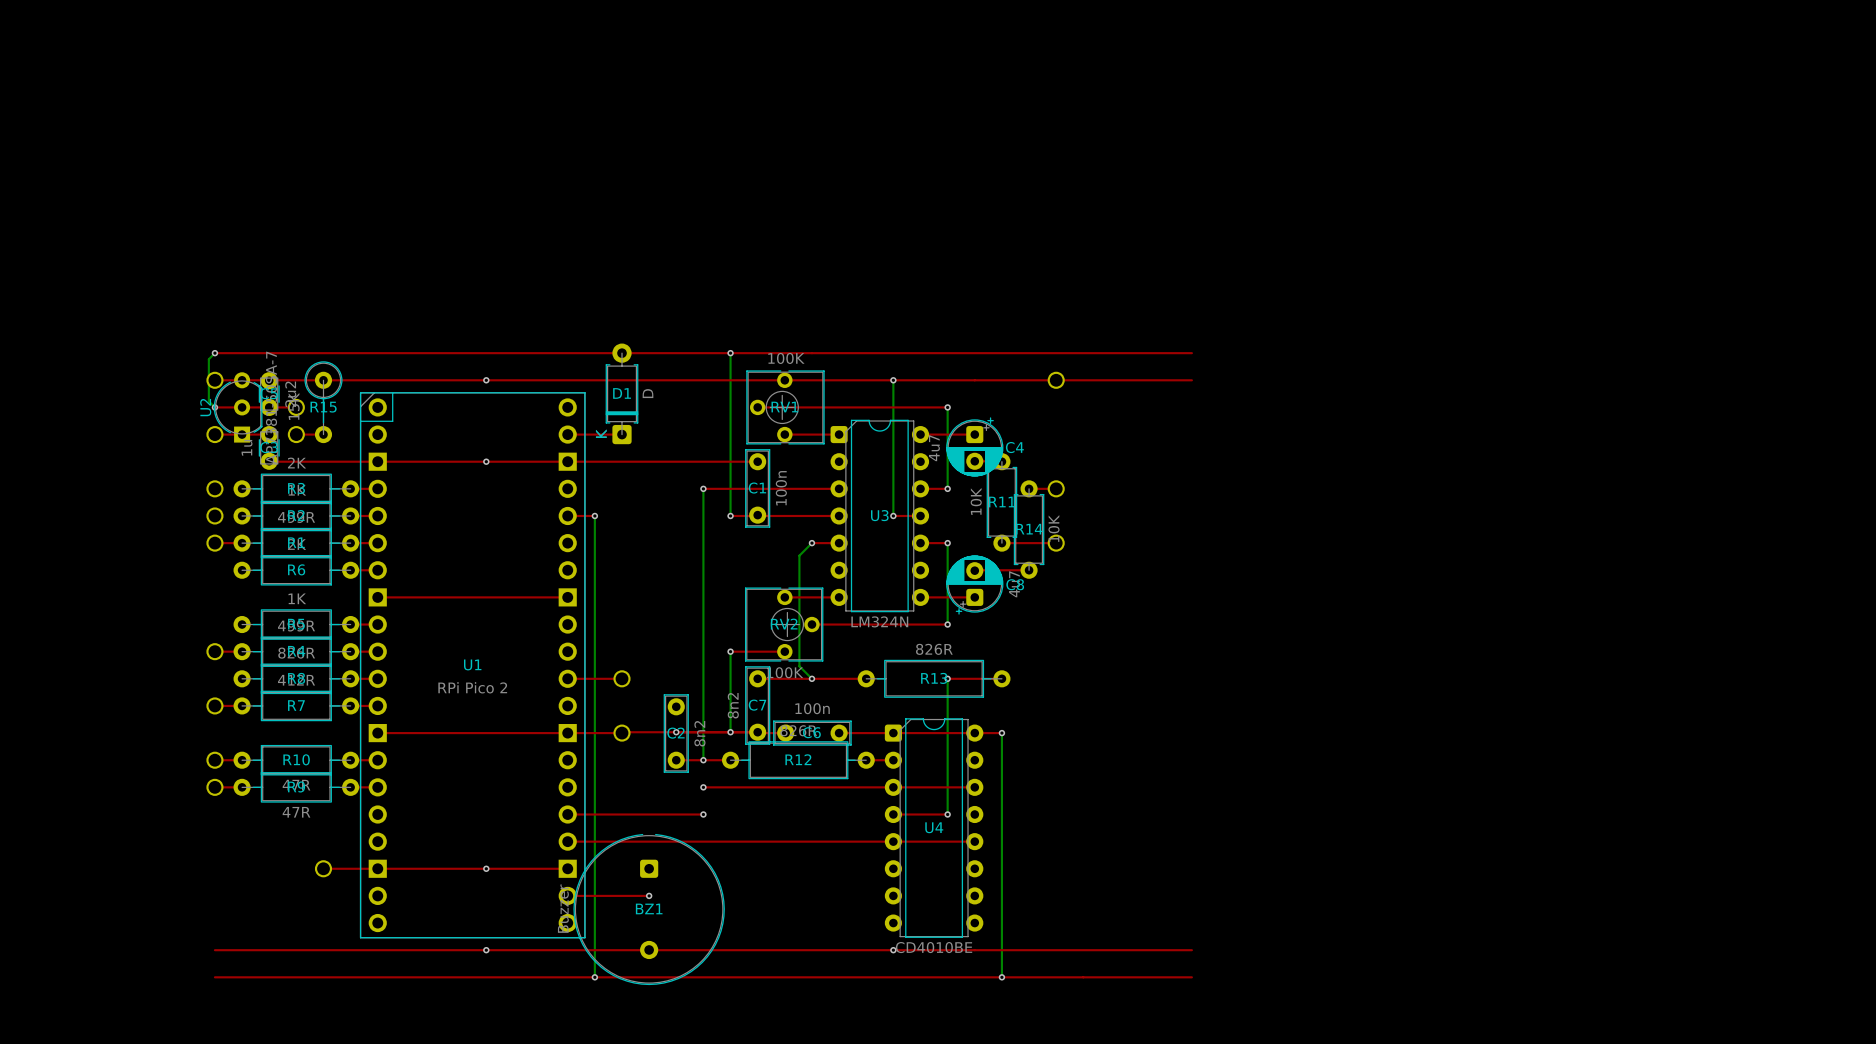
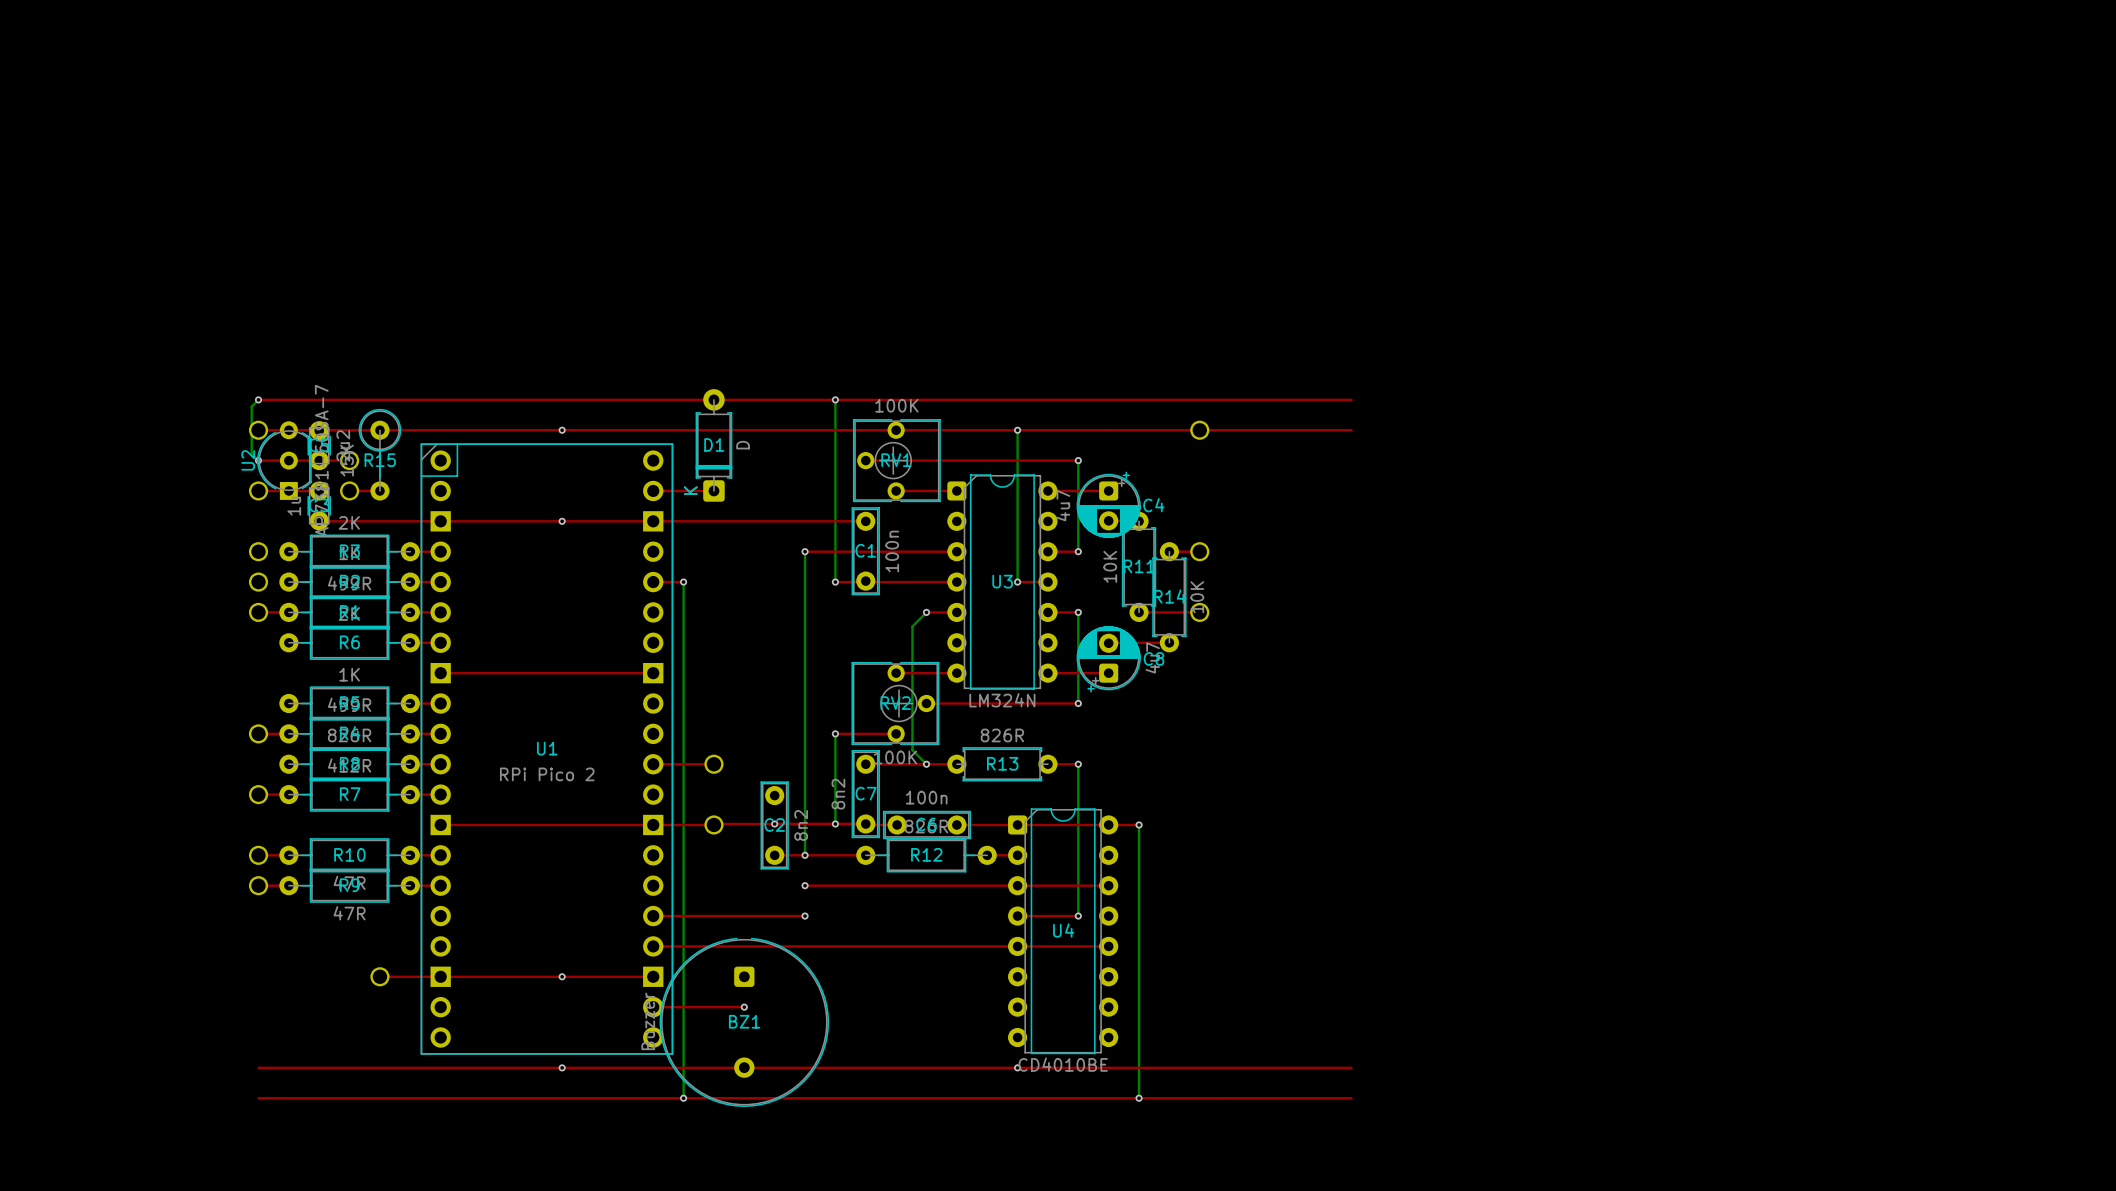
R13 footprint: [857, 659, 1011, 698] -> [947, 747, 1058, 782]
top track: (839, 678) (866, 678) -> (835, 855) (865, 855)
top track: (947, 678) (1001, 678) -> (1078, 764) (1047, 764)
R12 footprint: [722, 741, 875, 780] -> [856, 838, 997, 873]

